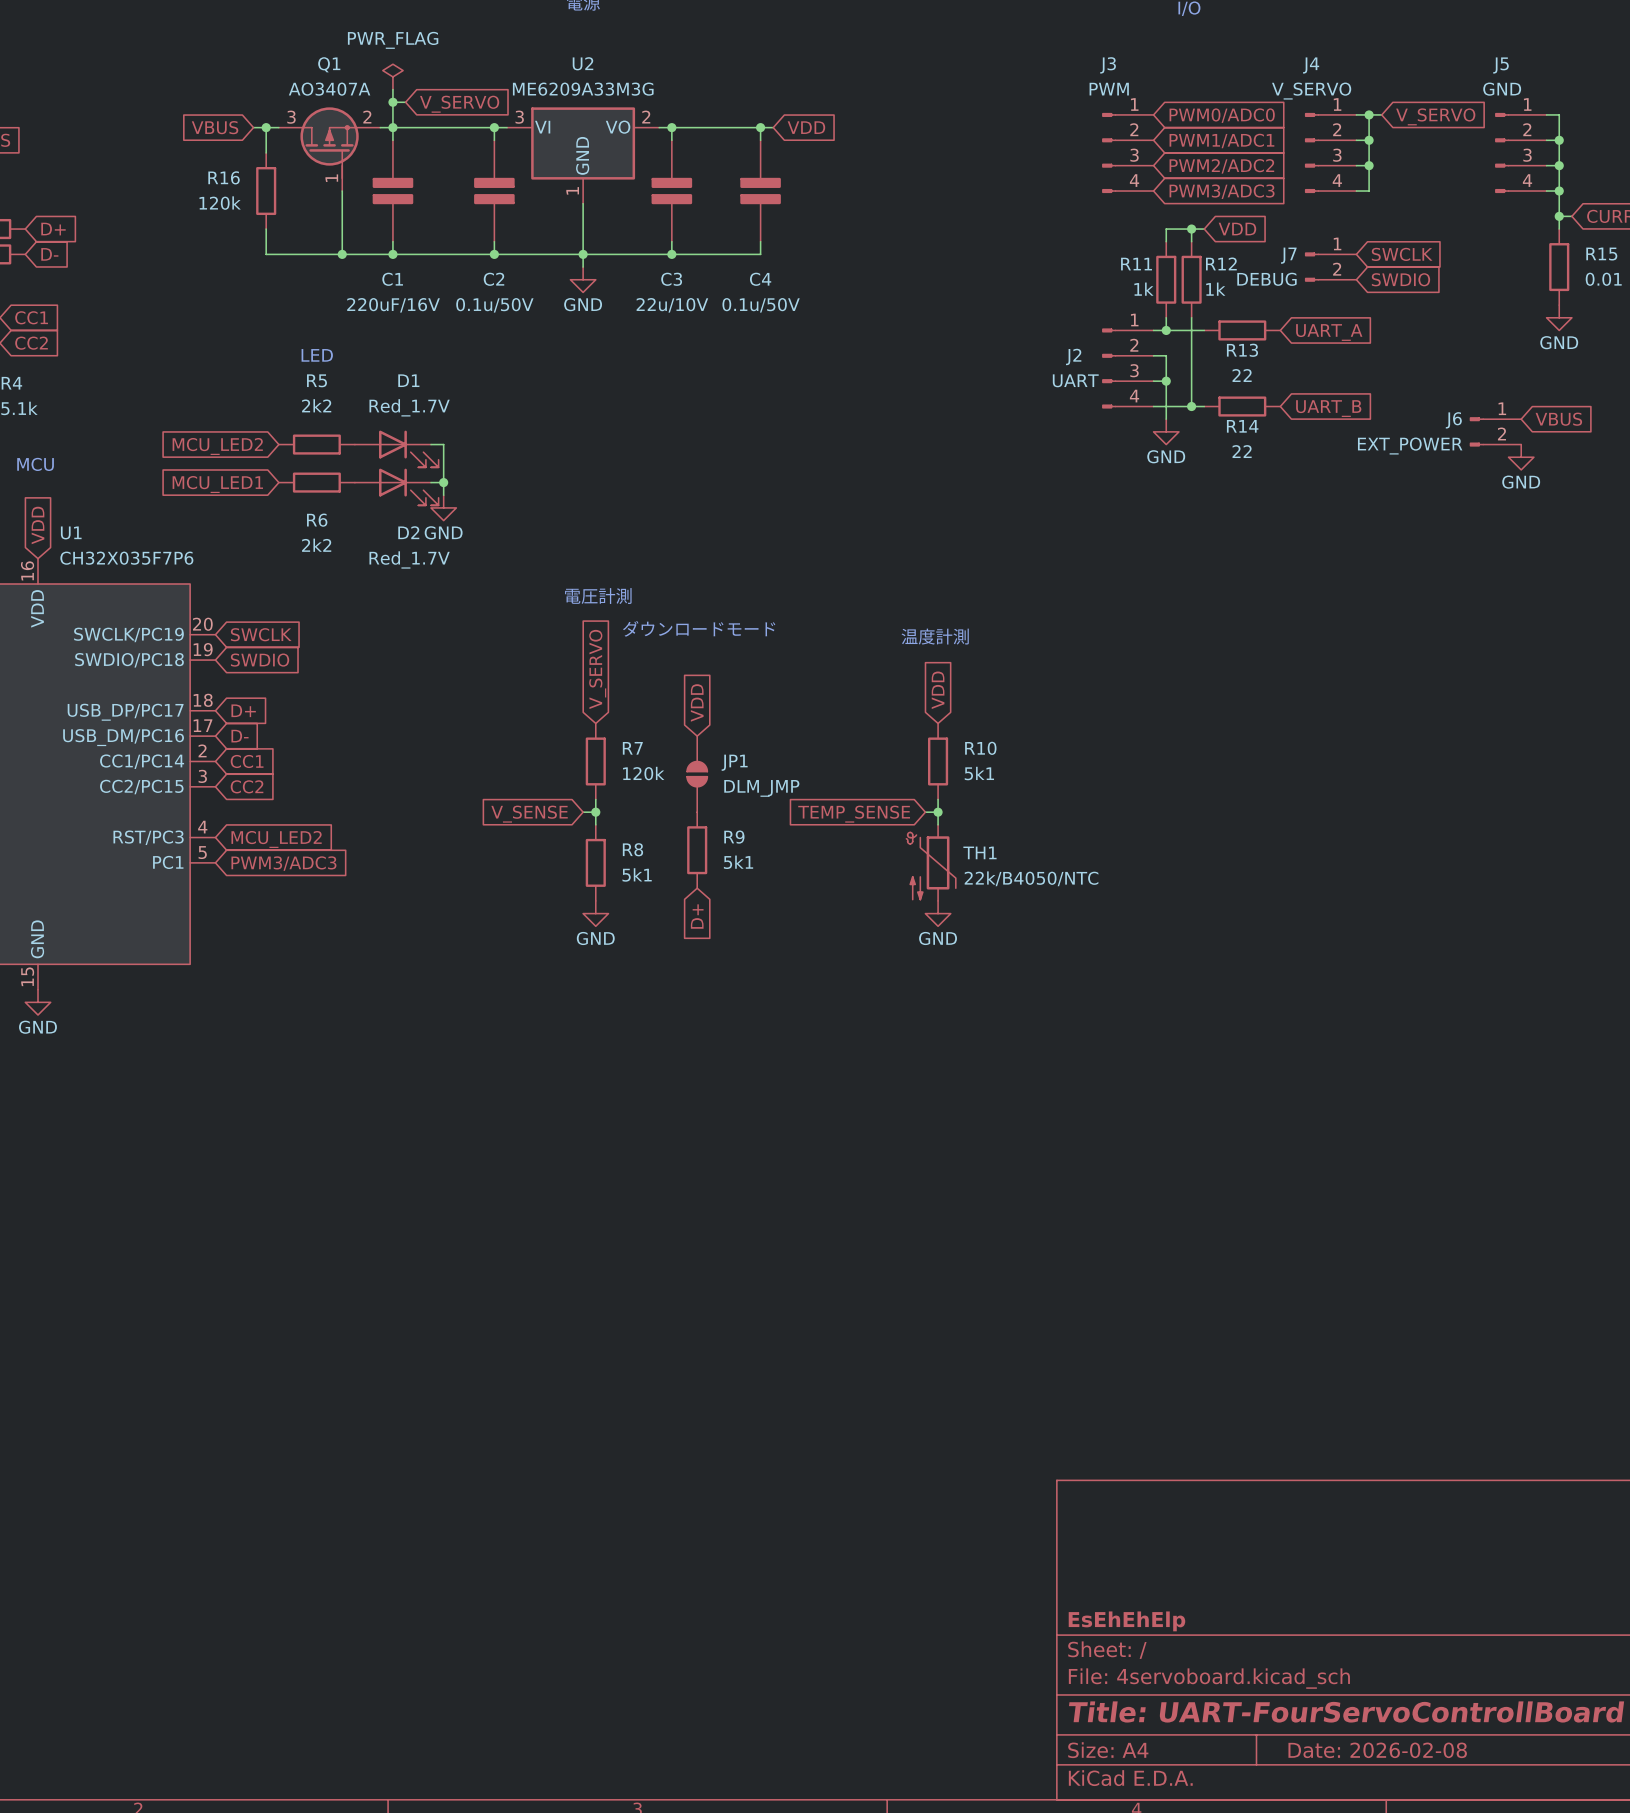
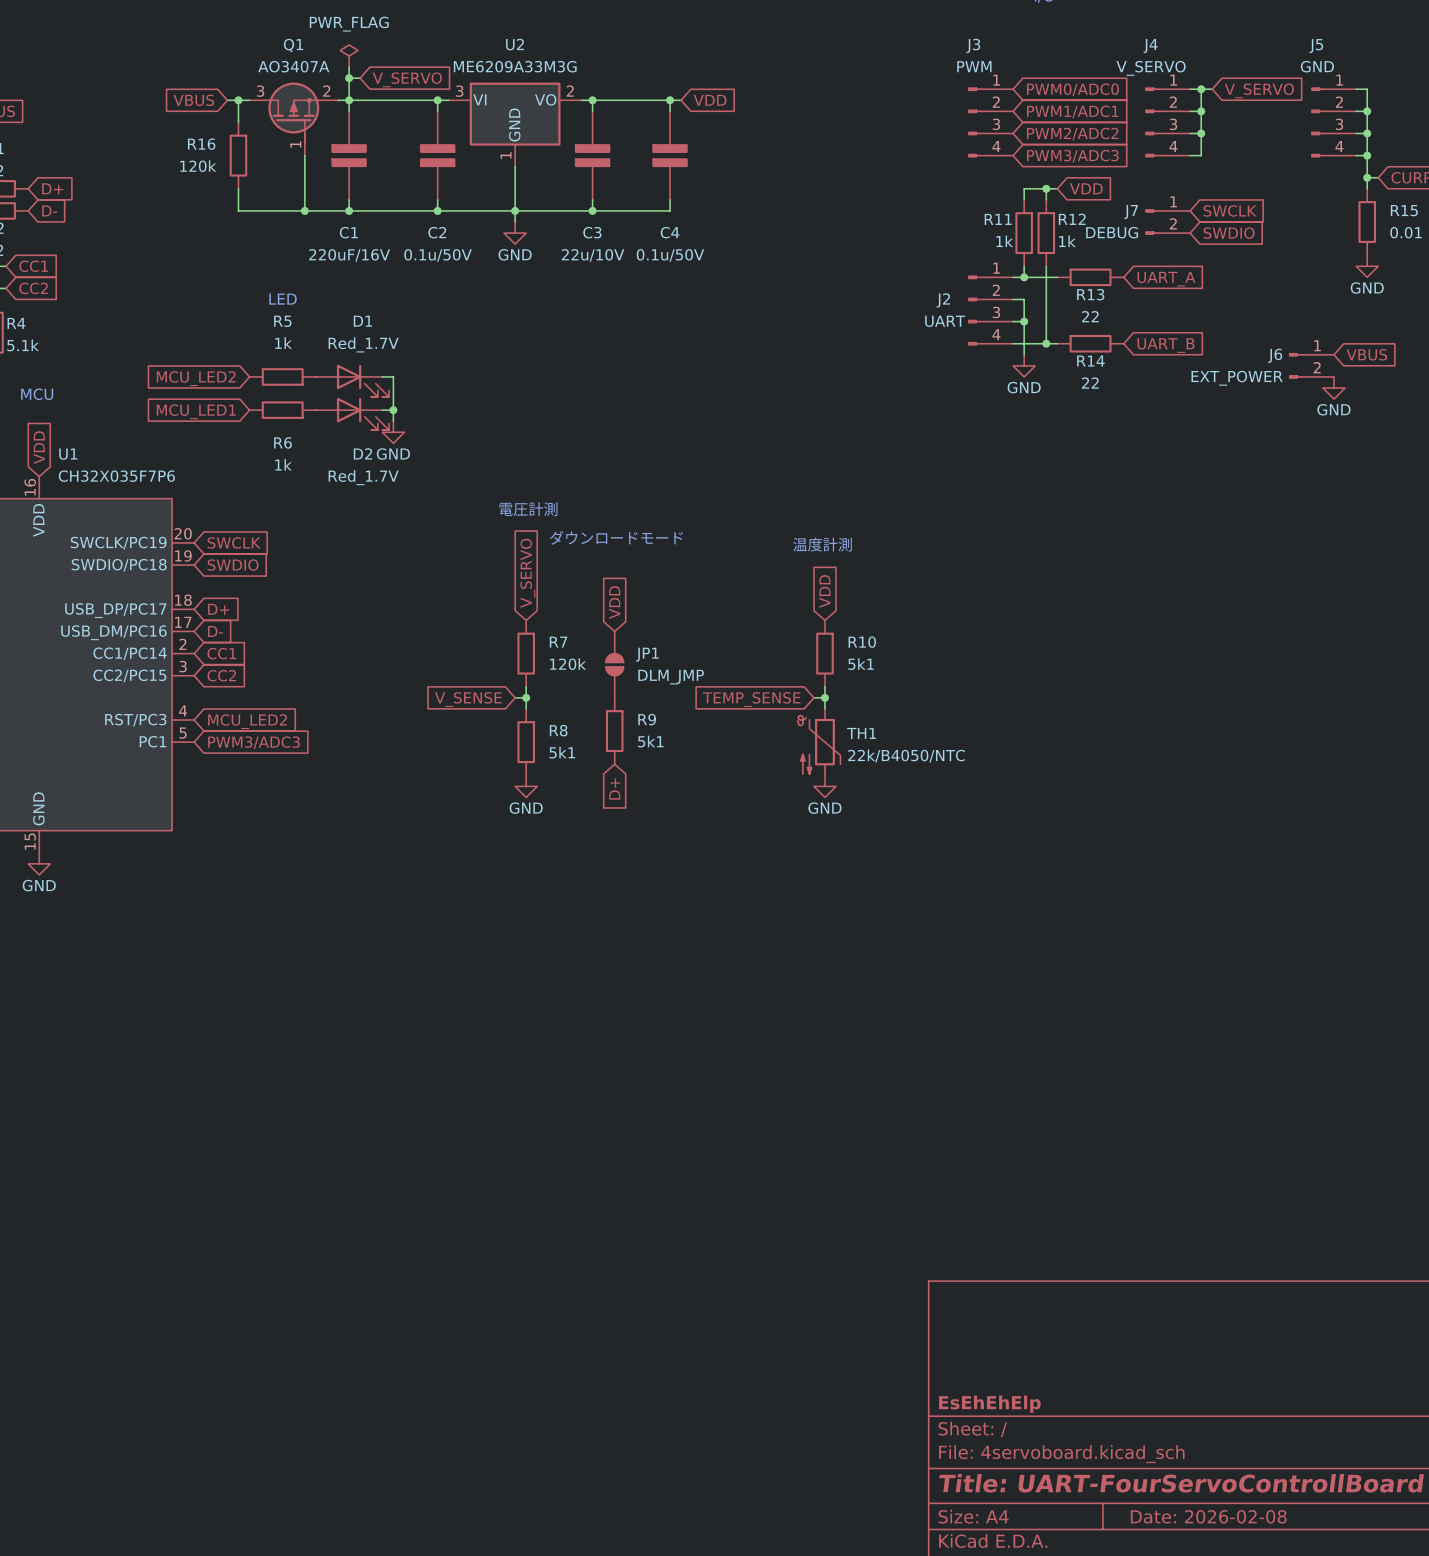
R5 value: 2k2 (316, 405) -> 1k (283, 343)
R6 value: 2k2 (316, 545) -> 1k (283, 464)

